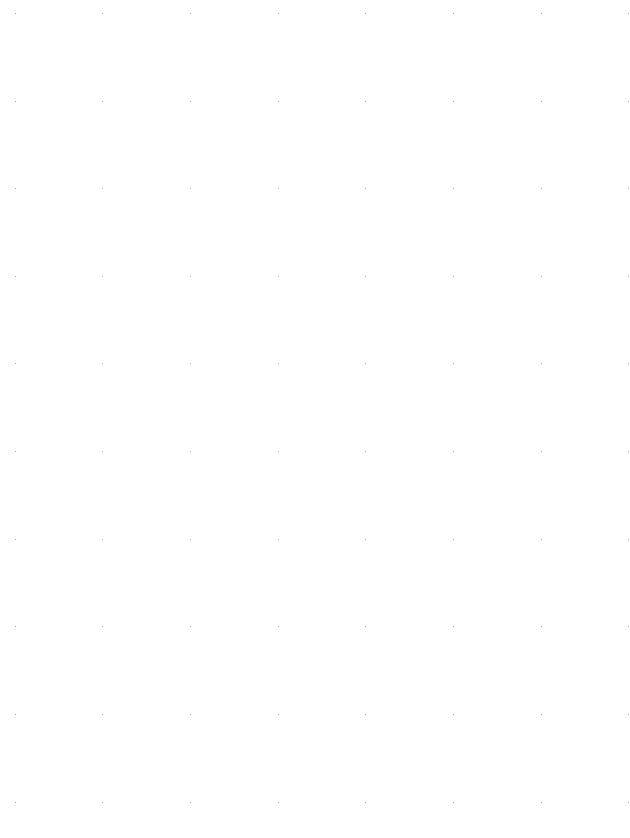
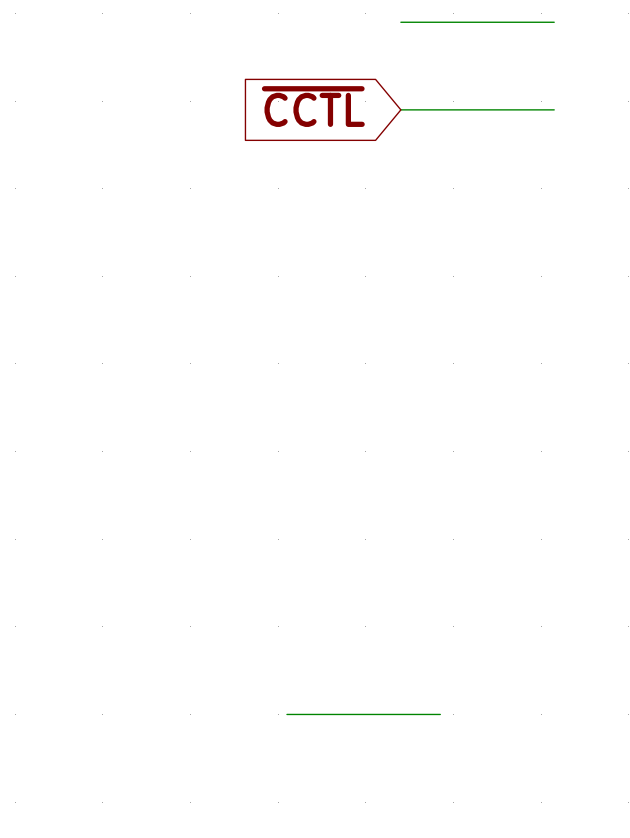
wire: none -> (400, 22) (554, 22)
global label: none -> ~{CCTL} (313, 106)
wire: none -> (400, 109) (554, 109)
wire: none -> (286, 714) (440, 714)

